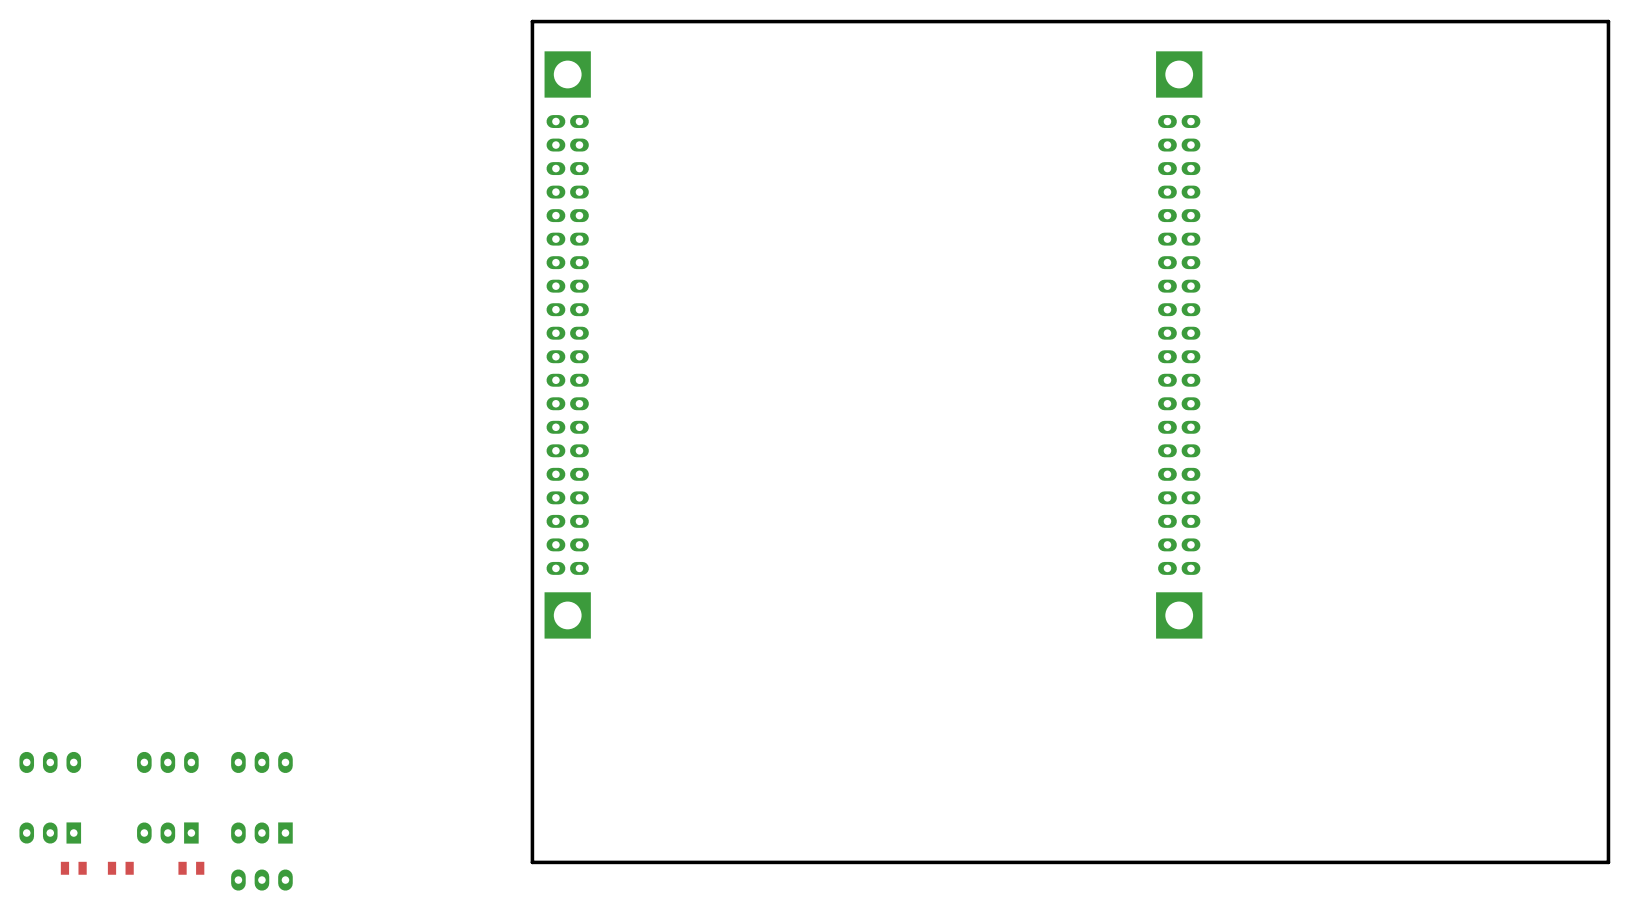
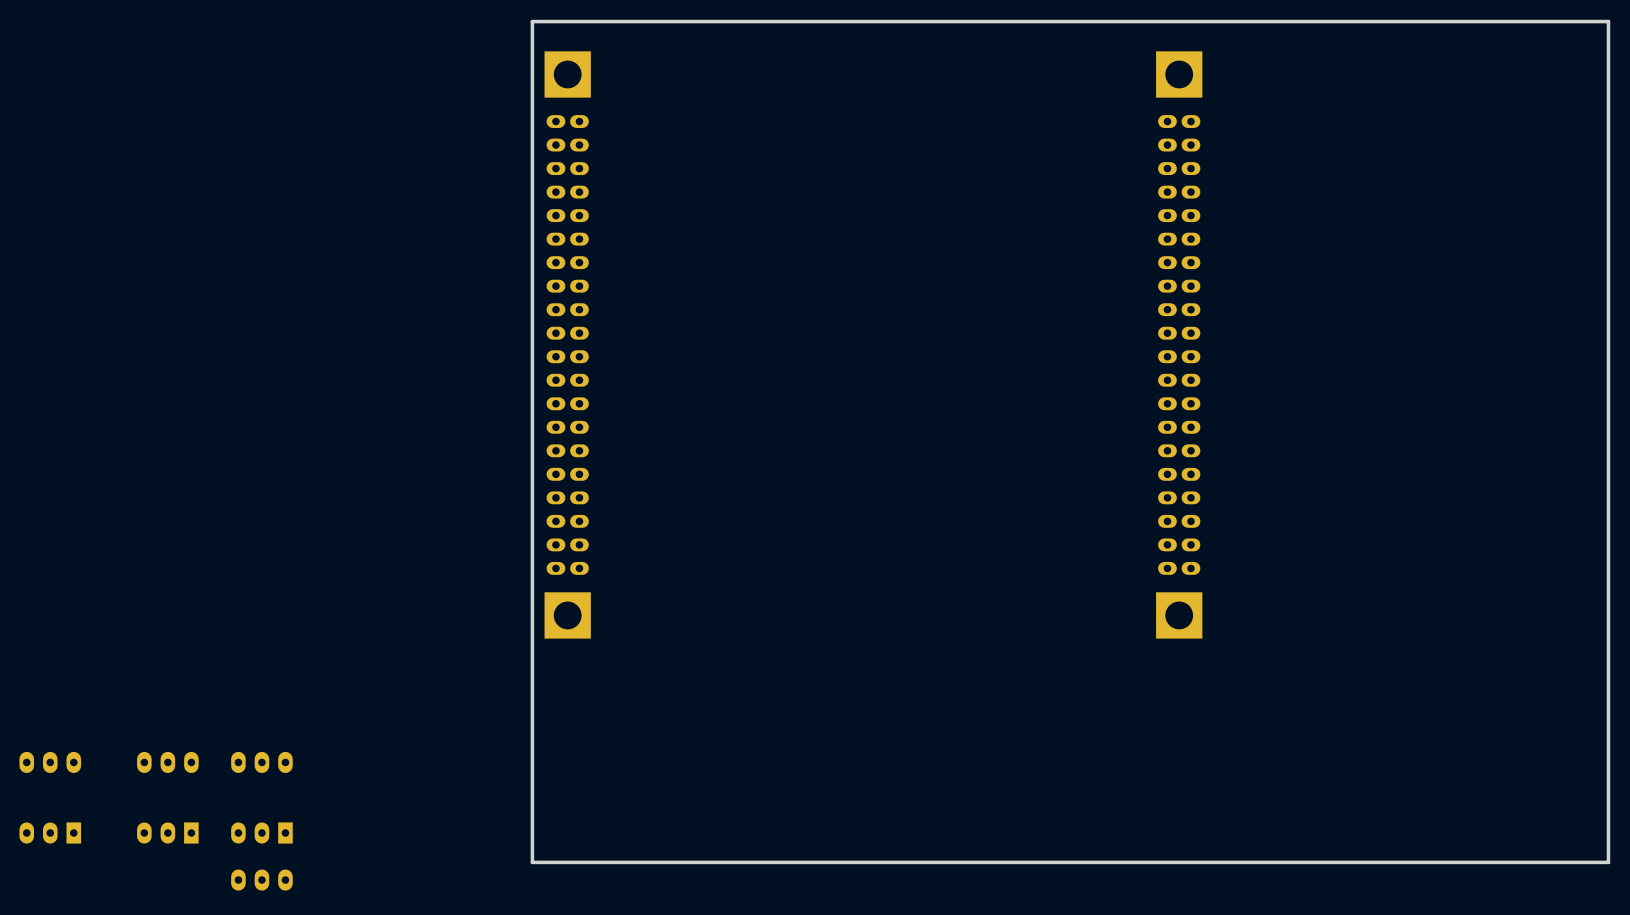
part: (73, 868) -> none
part: (120, 868) -> none
part: (191, 868) -> none

